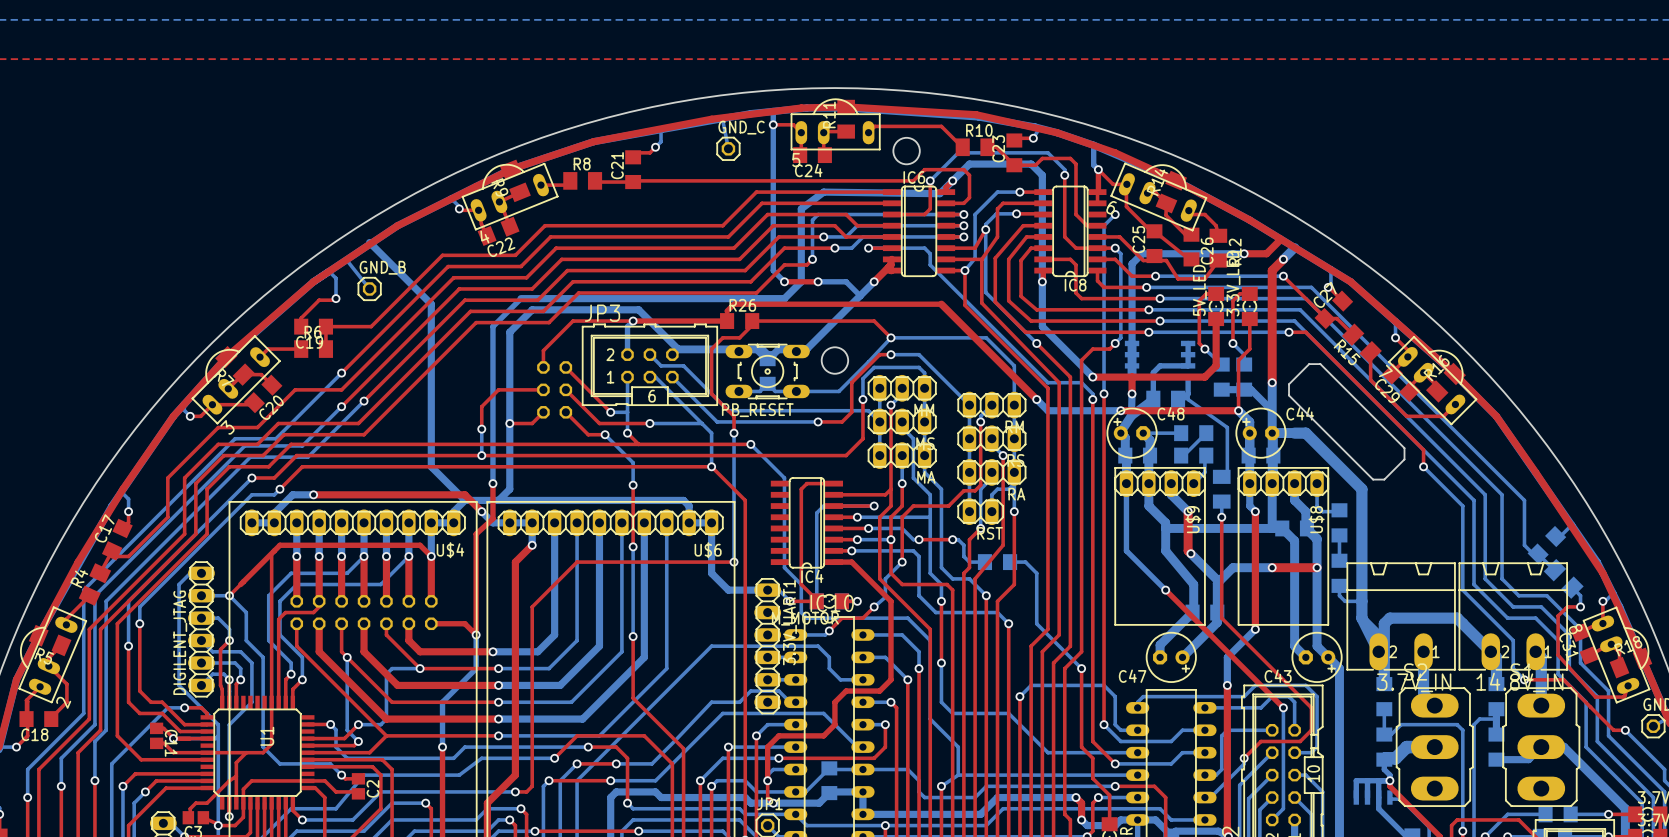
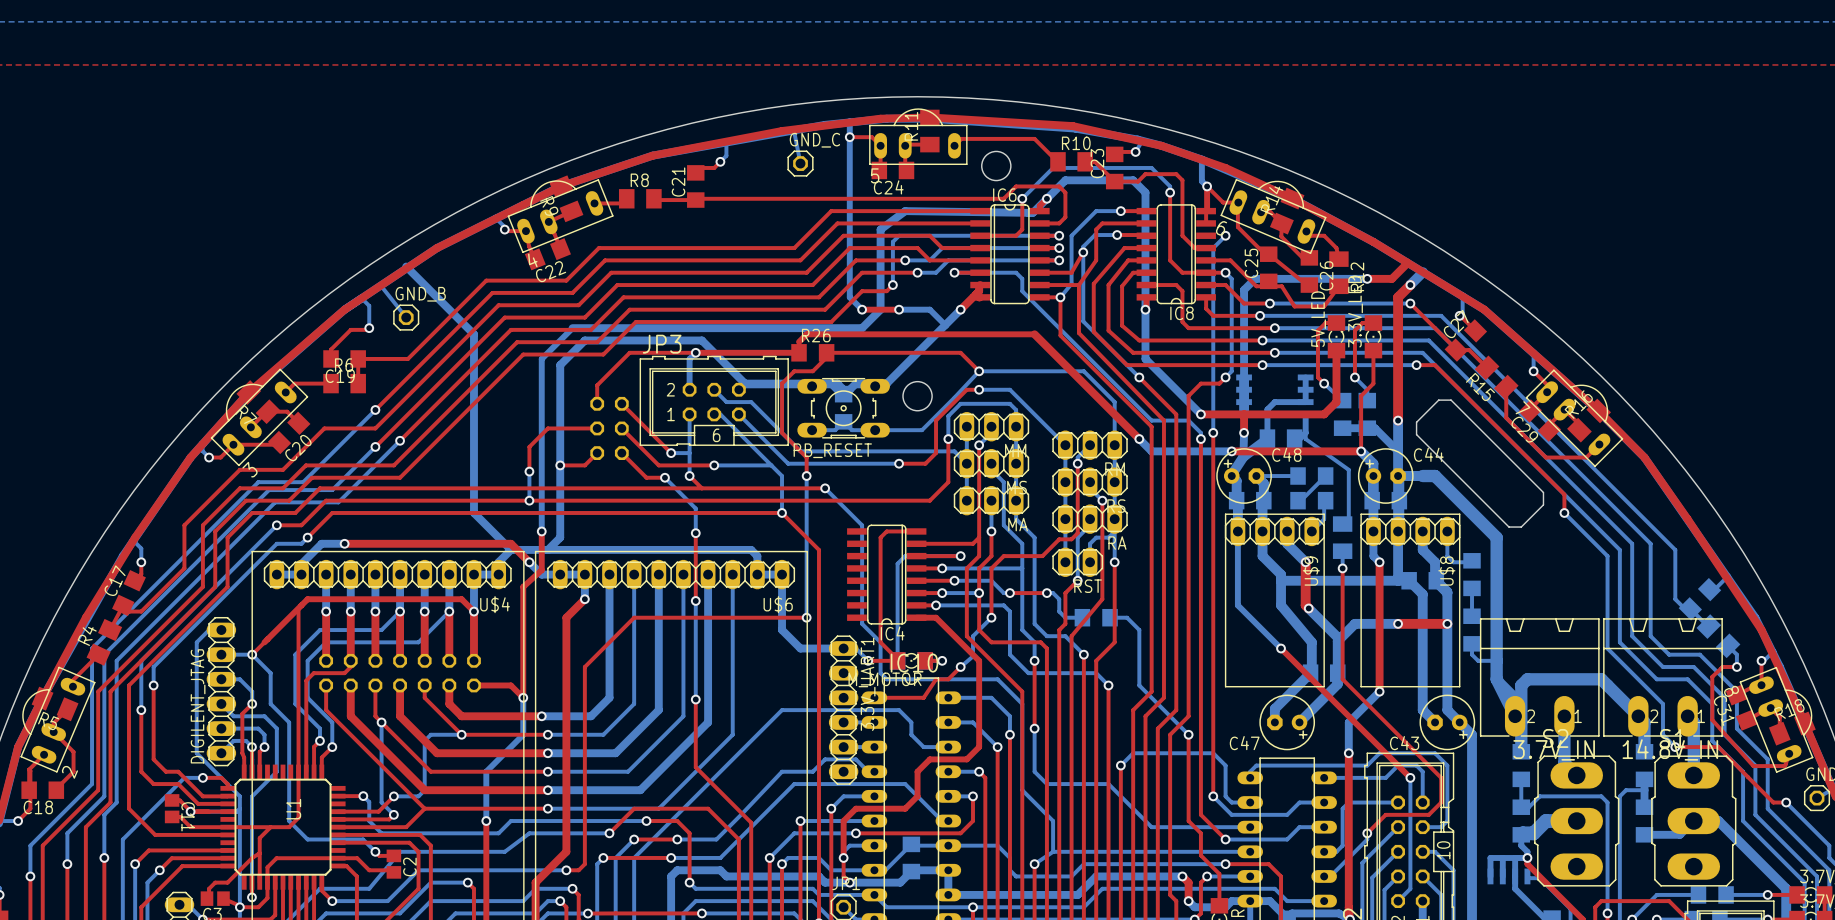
top track: (851, 618) (842, 618) (829, 630) -> (936, 679) (923, 697) (874, 697)
bottom track: (829, 630) (825, 634) (795, 634) -> none
via: (829, 630) -> none

